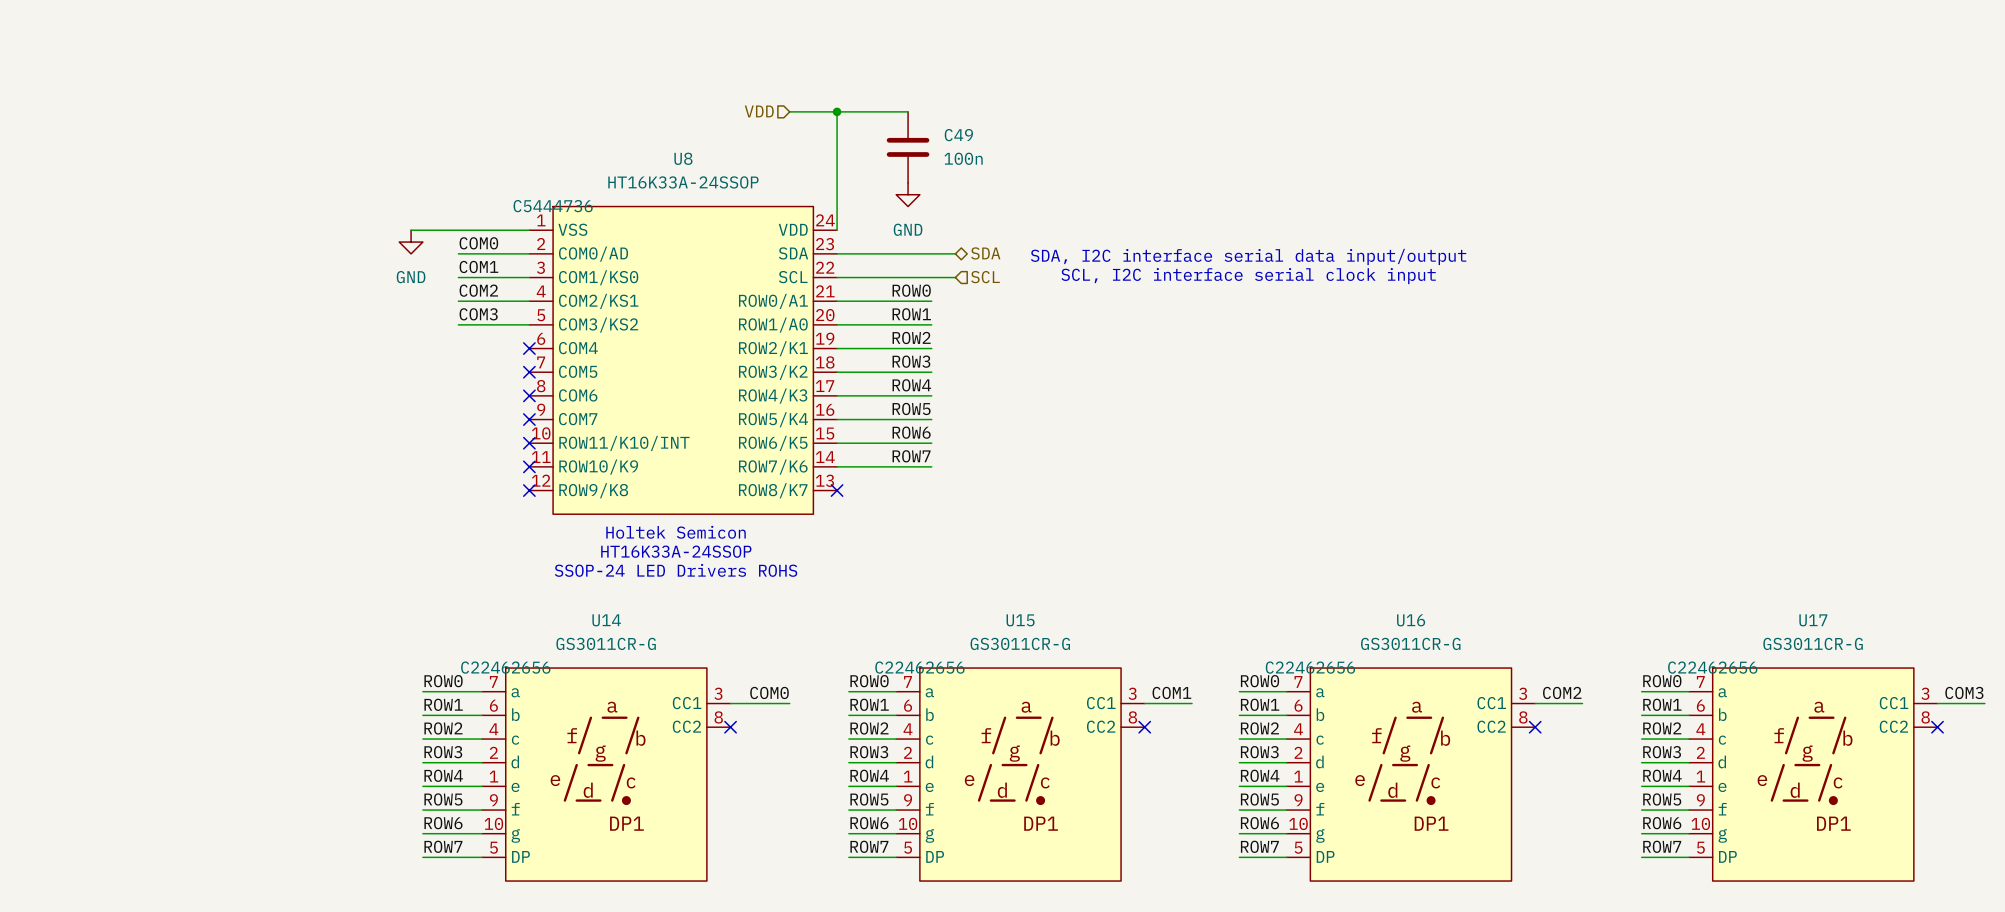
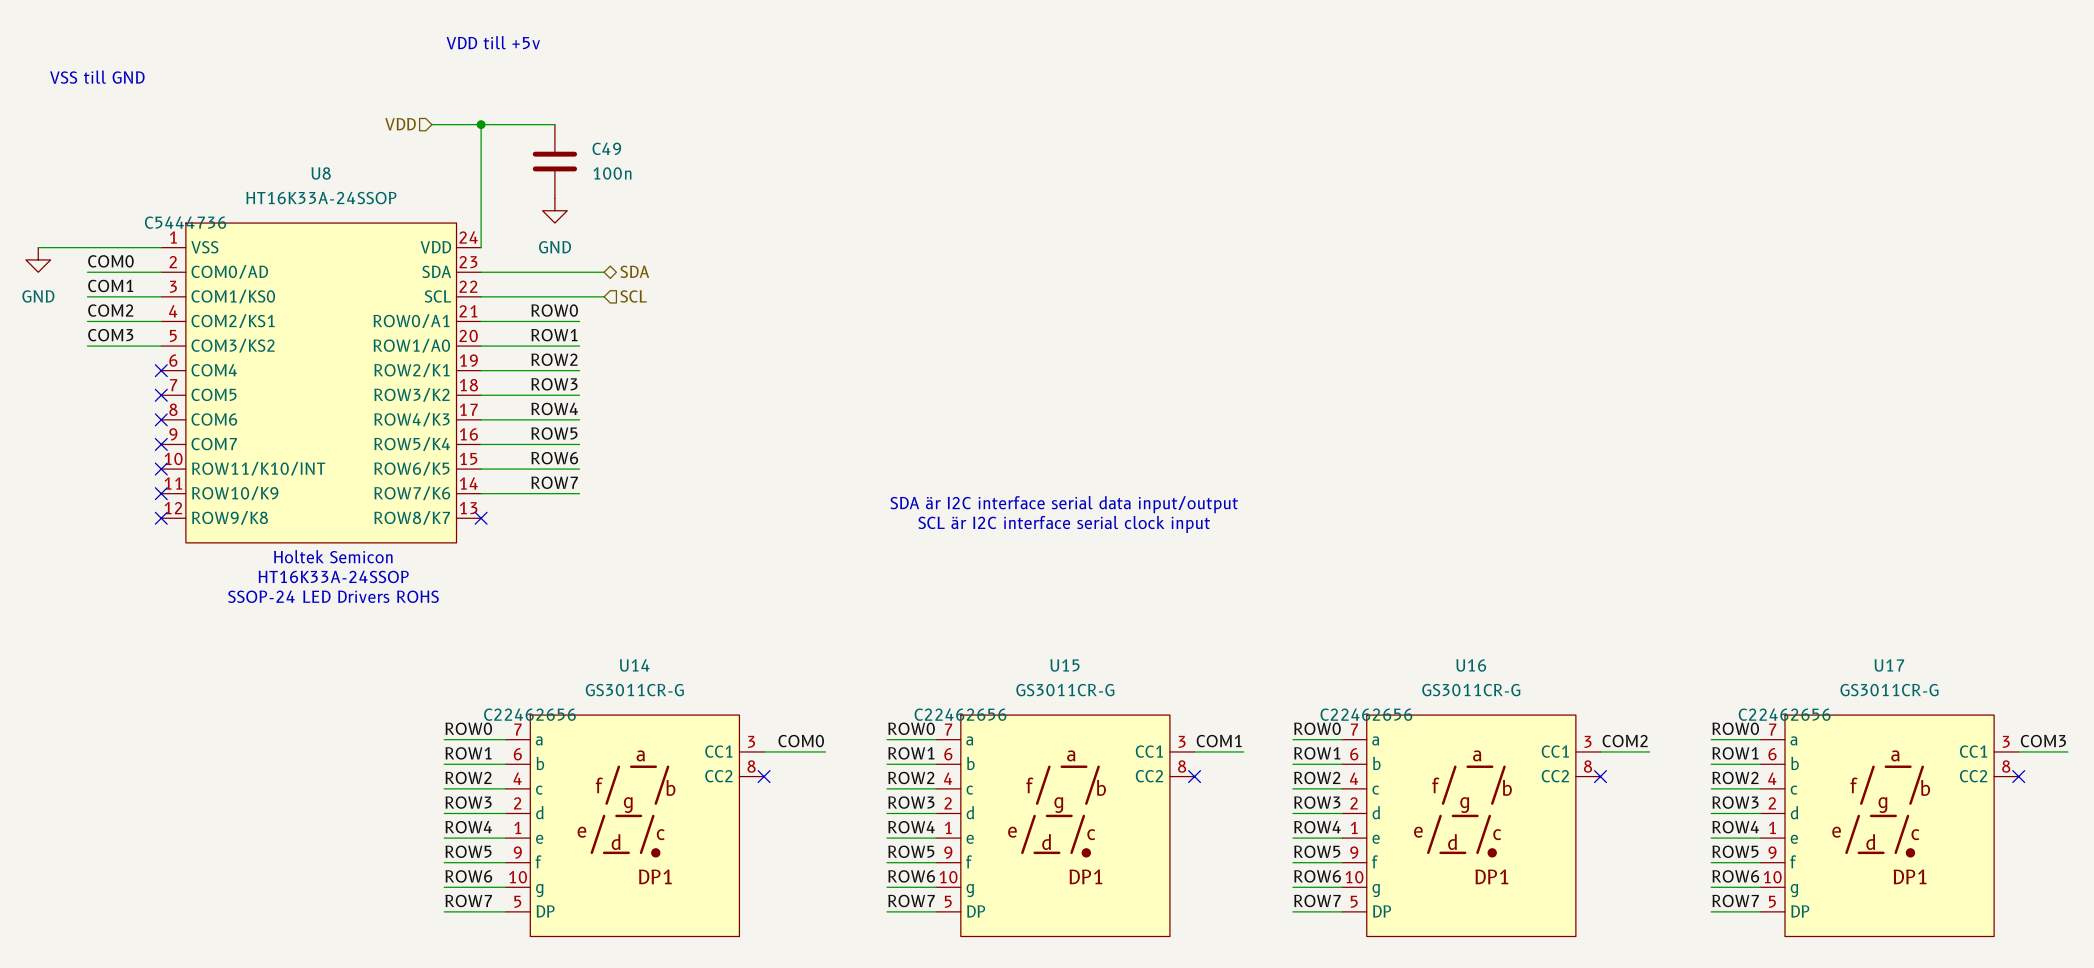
text: none -> VDD till +5v (493, 42)
text: none -> VSS till GND (97, 77)
hierarchical label: none -> VDD (400, 124)
wire: none -> (431, 124) (554, 124)
wire: none -> (481, 124) (481, 247)
junction: none -> (481, 124)
hierarchical label: VDD (759, 111) -> none
wire: (789, 111) (908, 111) -> none
wire: (837, 111) (837, 230) -> none
junction: (837, 111) -> none
C49 position: (908, 147) -> (554, 161)
power symbol: GND (908, 194) -> none
wire: none -> (38, 247) (161, 247)
power symbol: none -> GND (38, 259)
wire: (411, 230) (529, 230) -> (481, 272) (604, 272)
label: none -> COM0 (110, 261)
hierarchical label: none -> SDA (634, 271)
wire: none -> (87, 272) (161, 272)
power symbol position: GND (411, 242) -> GND (554, 210)
label: COM0 (478, 243) -> none
wire: (458, 253) (529, 253) -> none
wire: (837, 253) (955, 253) -> none
hierarchical label: SDA (985, 253) -> none
label: none -> COM1 (110, 285)
text: SDA, I2C interface serial data input/output (1248, 256) -> none
wire: none -> (87, 296) (161, 296)
wire: none -> (481, 296) (604, 296)
hierarchical label: none -> SCL (633, 296)
label: COM1 (478, 266) -> none
text: SCL, I2C interface serial clock input (1248, 276) -> none
wire: (458, 277) (529, 277) -> none
wire: (837, 277) (955, 277) -> none
hierarchical label: SCL (985, 277) -> none
label: none -> COM2 (110, 310)
label: none -> ROW0 (554, 310)
wire: none -> (87, 321) (161, 321)
wire: none -> (481, 321) (579, 321)
label: COM2 (478, 290) -> none
label: ROW0 (911, 290) -> none
wire: (458, 301) (529, 301) -> none
wire: (837, 301) (931, 301) -> none
label: none -> COM3 (110, 335)
label: none -> ROW1 (554, 335)
wire: none -> (87, 346) (161, 346)
wire: none -> (481, 346) (579, 346)
label: COM3 (478, 314) -> none
label: ROW1 (911, 314) -> none
wire: (458, 324) (529, 324) -> none
wire: (837, 324) (931, 324) -> none
label: none -> ROW2 (554, 359)
no-connect mark: none -> (161, 370)
wire: none -> (481, 370) (579, 370)
label: ROW2 (911, 337) -> none
no-connect mark: (529, 348) -> none
wire: (837, 348) (931, 348) -> none
label: none -> ROW3 (554, 384)
no-connect mark: none -> (161, 395)
wire: none -> (481, 395) (579, 395)
U8 position: (683, 360) -> (321, 382)
label: ROW3 (911, 361) -> none
no-connect mark: (529, 372) -> none
wire: (837, 372) (931, 372) -> none
label: none -> ROW4 (554, 408)
no-connect mark: none -> (161, 419)
wire: none -> (481, 419) (579, 419)
label: ROW4 (911, 385) -> none
no-connect mark: (529, 395) -> none
wire: (837, 395) (931, 395) -> none
label: none -> ROW5 (554, 433)
no-connect mark: none -> (161, 444)
wire: none -> (481, 444) (579, 444)
label: ROW5 (911, 408) -> none
no-connect mark: (529, 419) -> none
wire: (837, 419) (931, 419) -> none
label: none -> ROW6 (554, 458)
no-connect mark: none -> (161, 469)
wire: none -> (481, 469) (579, 469)
label: ROW6 (911, 432) -> none
no-connect mark: (529, 443) -> none
wire: (837, 443) (931, 443) -> none
label: none -> ROW7 (554, 482)
no-connect mark: none -> (161, 493)
wire: none -> (481, 493) (579, 493)
label: ROW7 (911, 456) -> none
text: none -> SDA är I2C interface serial data input/output (1064, 504)
no-connect mark: (529, 466) -> none
wire: (837, 466) (931, 466) -> none
no-connect mark: none -> (161, 518)
no-connect mark: none -> (481, 518)
text: none -> SCL är I2C interface serial clock input (1064, 524)
no-connect mark: (529, 490) -> none
no-connect mark: (837, 490) -> none
text: none -> Holtek Semicon (333, 556)
text: Holtek Semicon (676, 532) -> none
text: none -> HT16K33A-24SSOP (333, 576)
text: HT16K33A-24SSOP (676, 551) -> none
text: none -> SSOP-24 LED Drivers ROHS (333, 596)
text: SSOP-24 LED Drivers ROHS (676, 570) -> none

